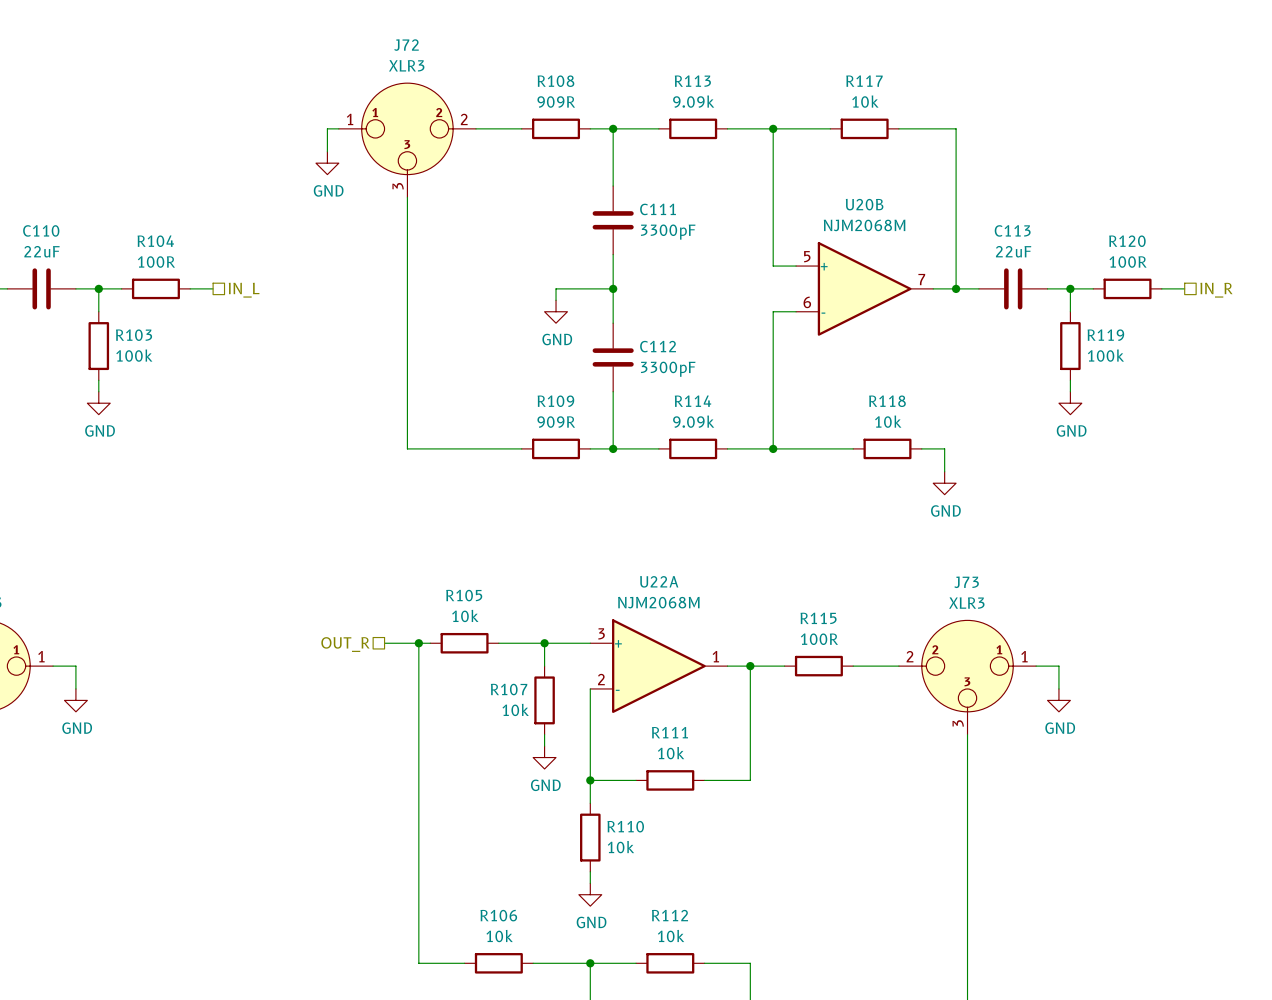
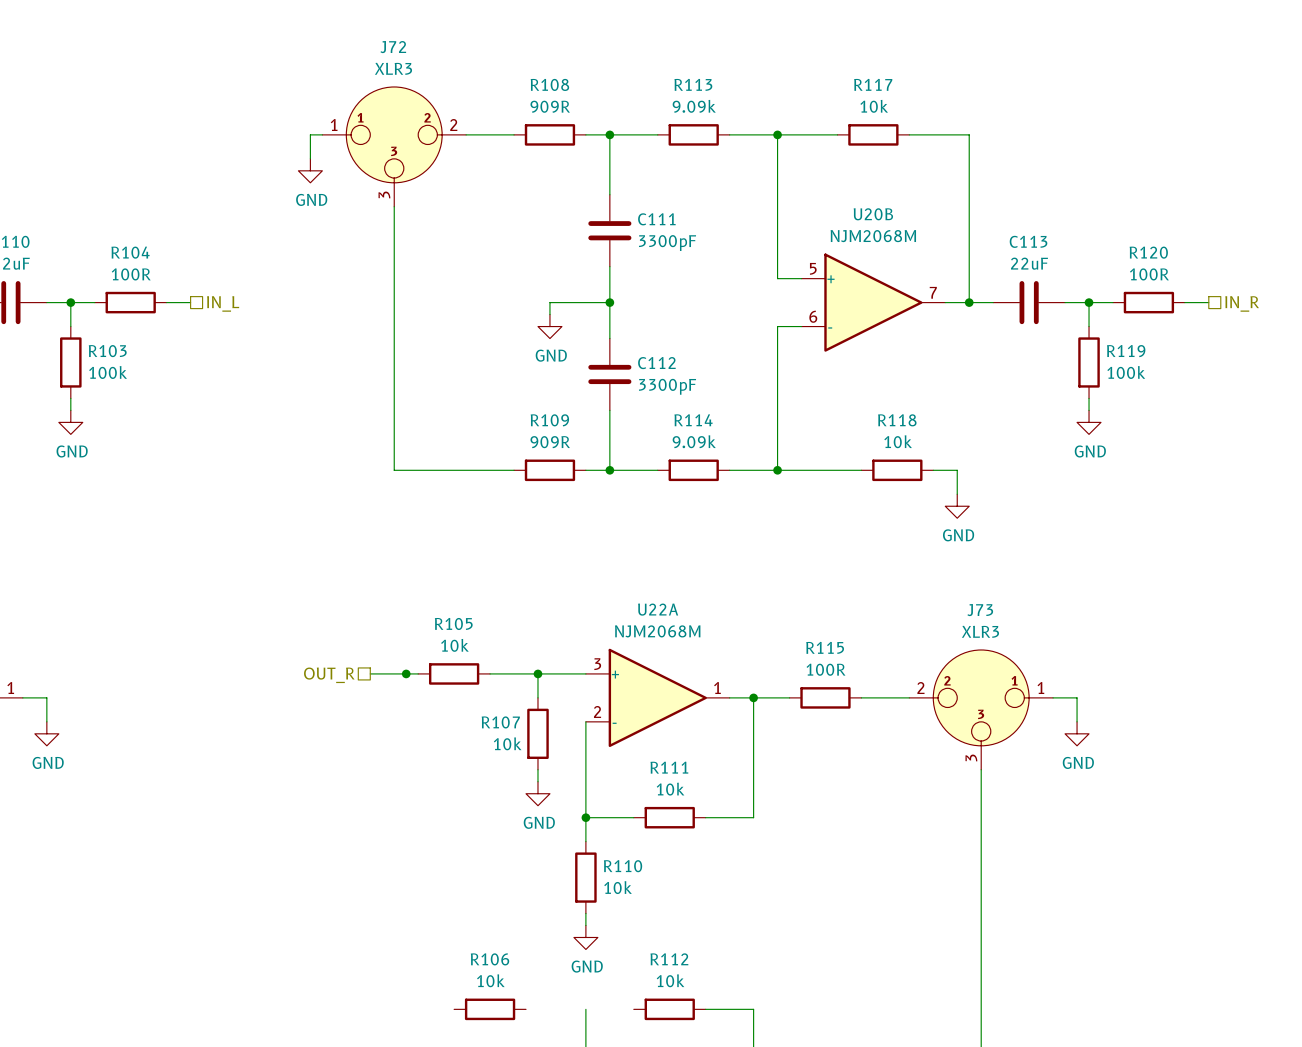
wire: (418, 643) (418, 963) (464, 963) -> none
wire: (533, 963) (636, 963) -> none
junction: (590, 963) -> none

